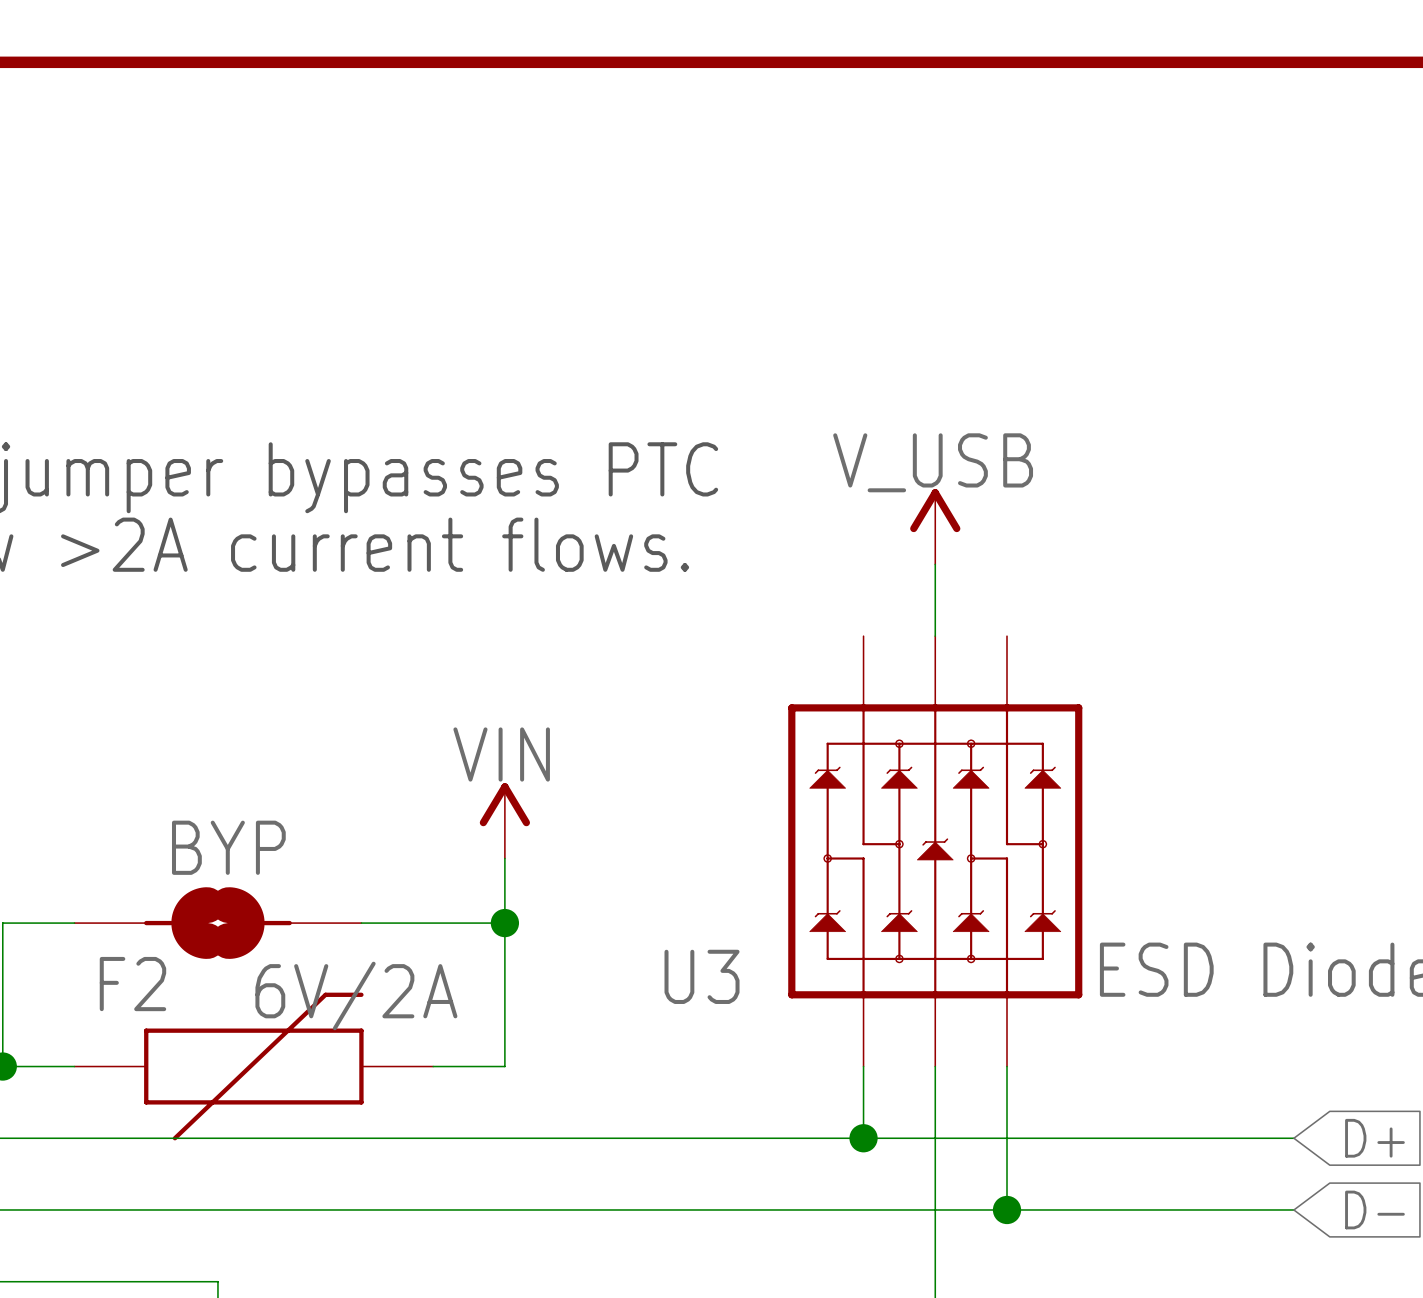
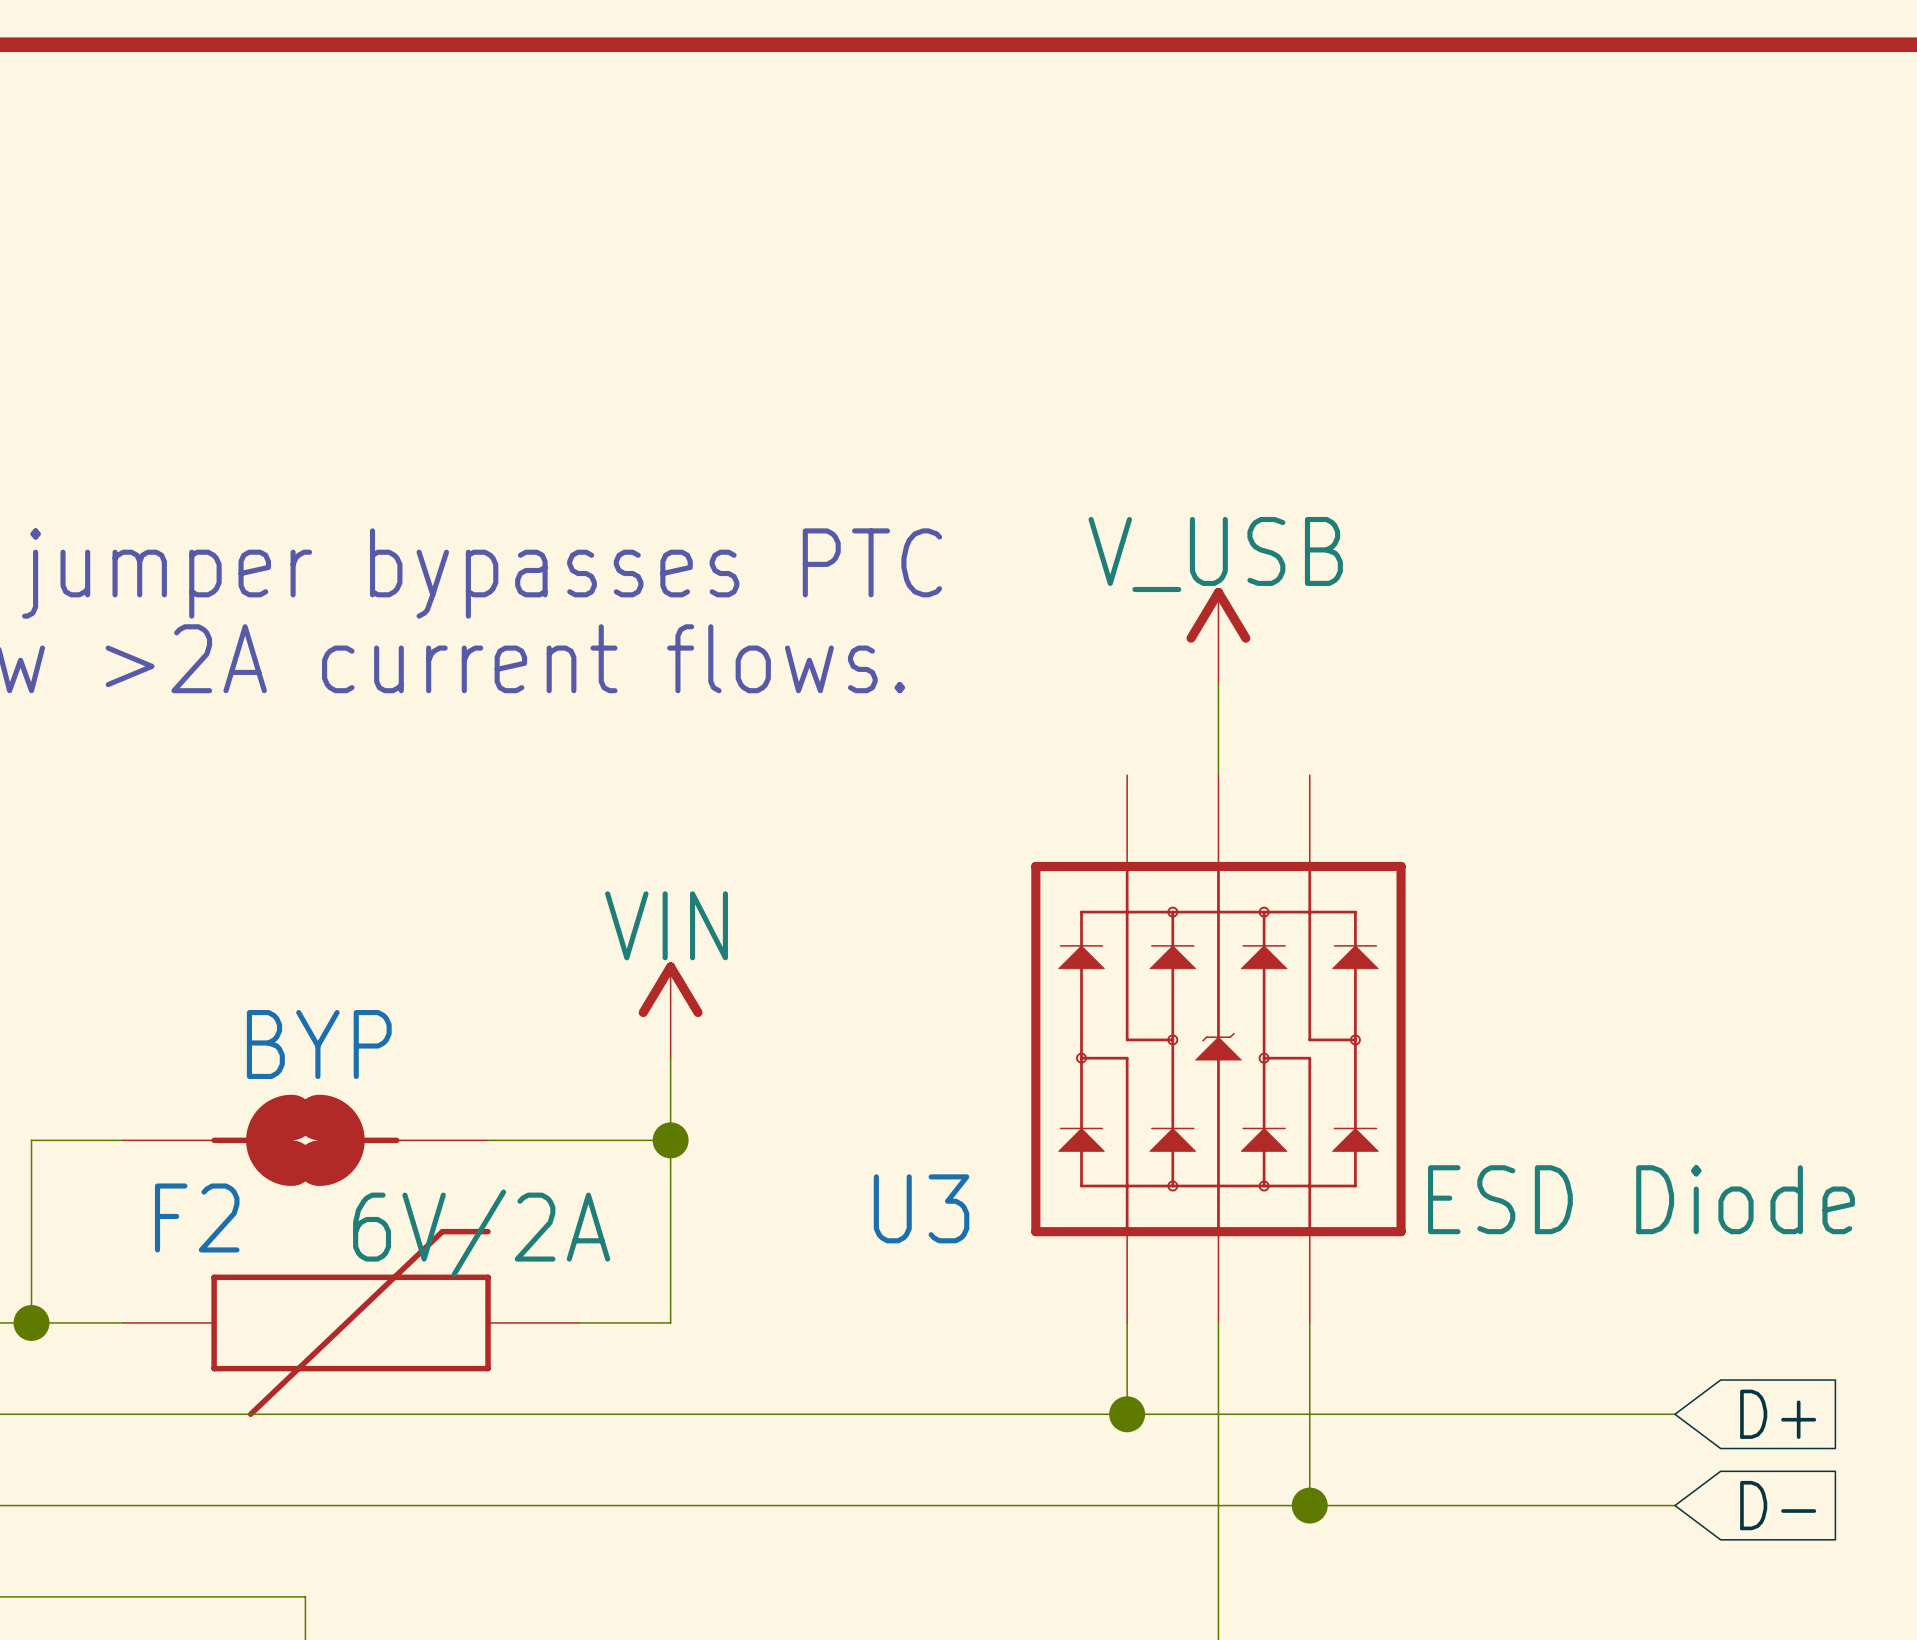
U3 symbol: [788, 636, 1083, 1067] -> [1031, 775, 1406, 1323]

